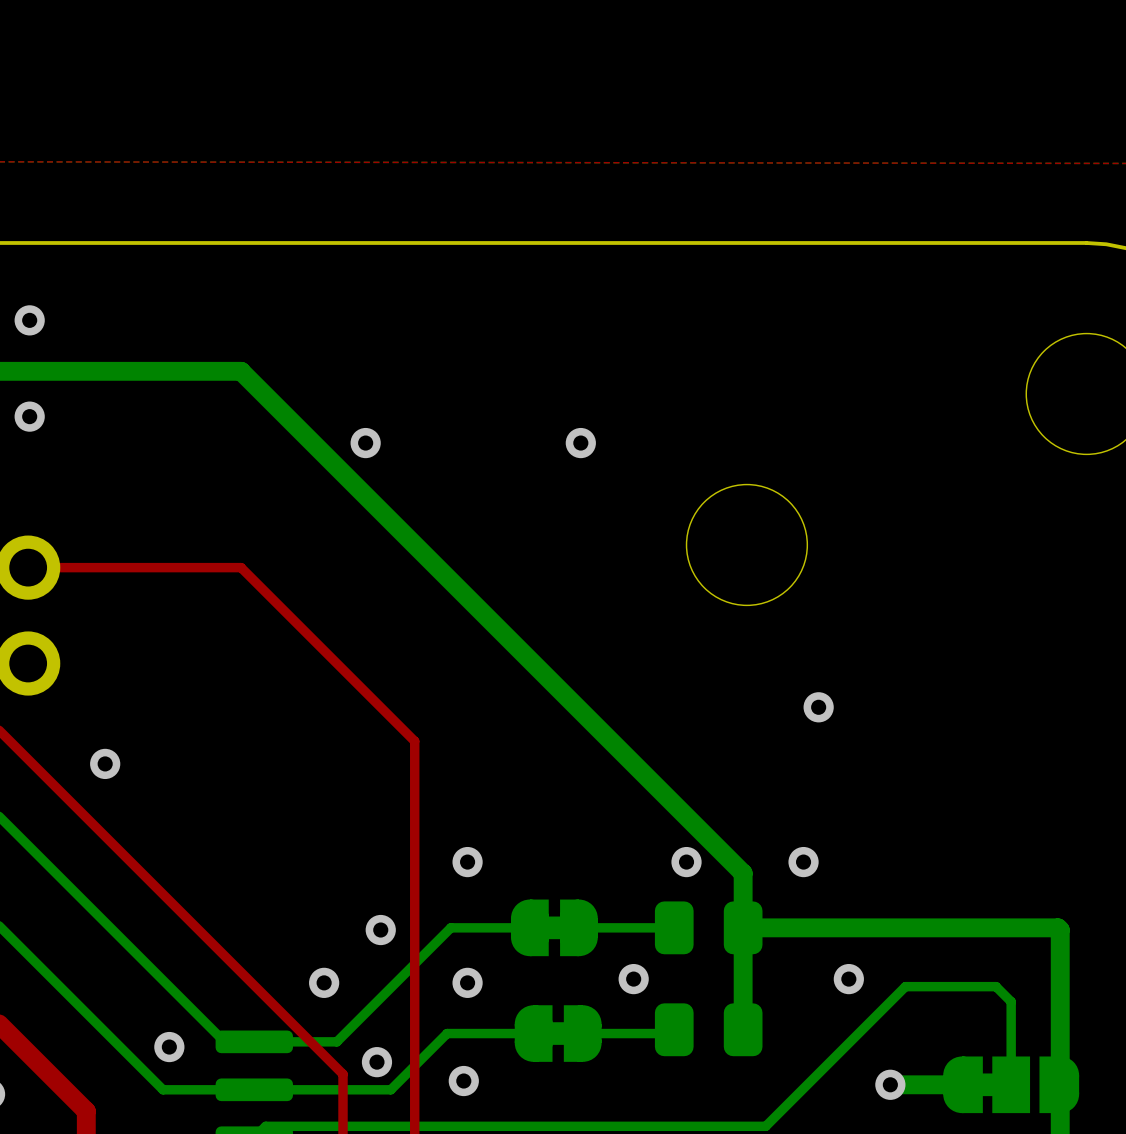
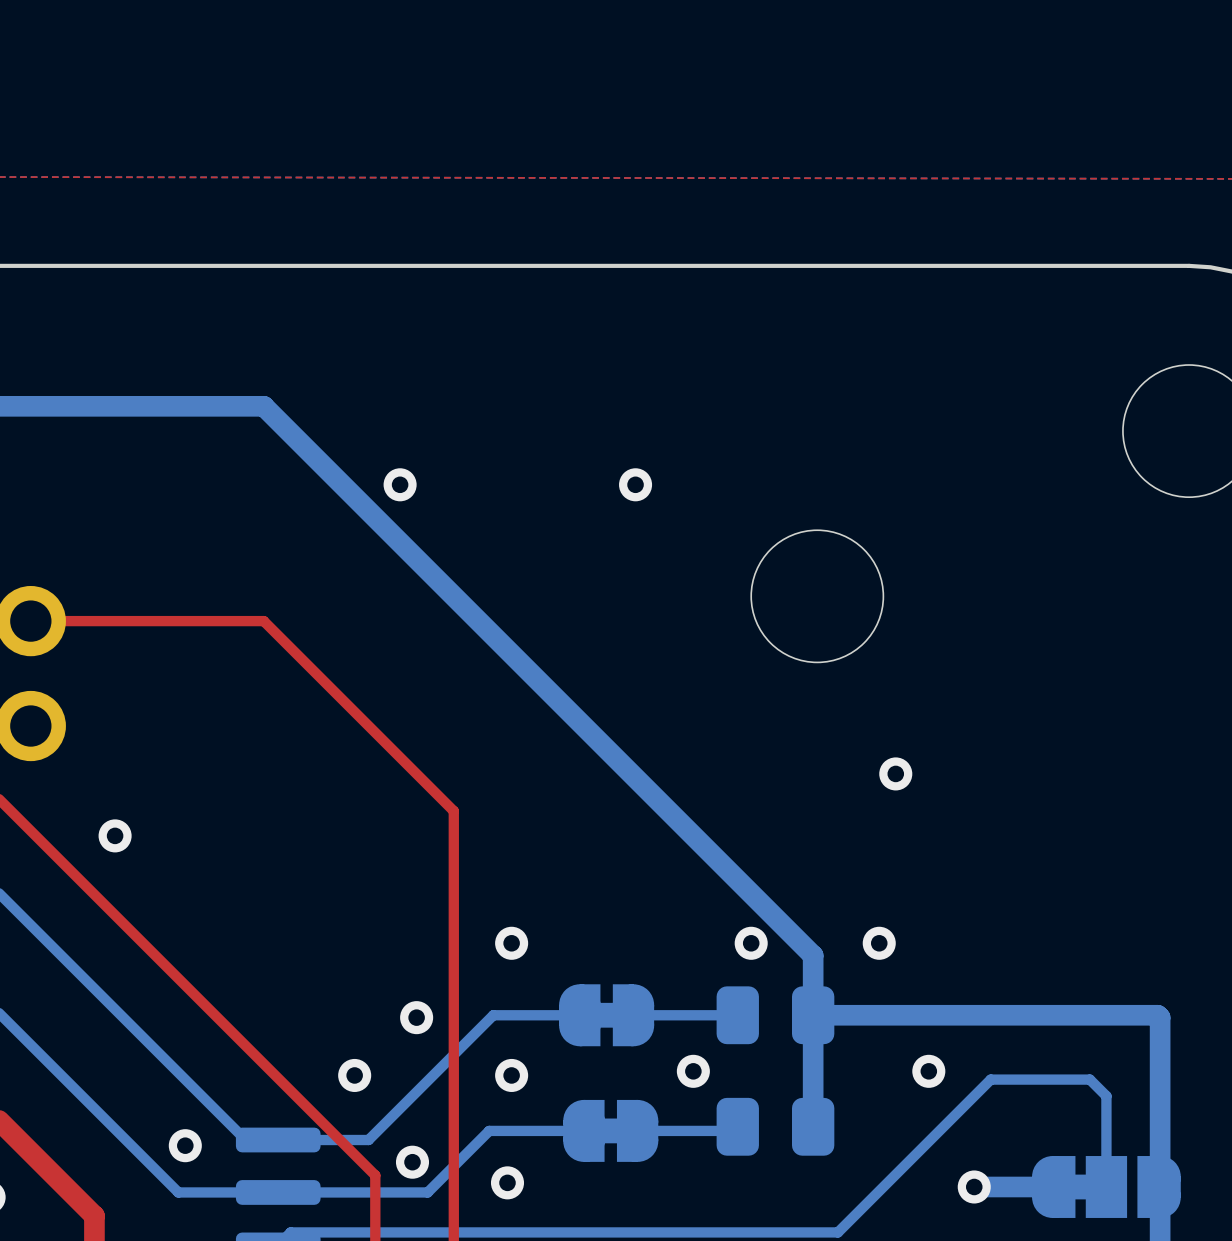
via: (29, 320) -> none
via: (29, 416) -> none

